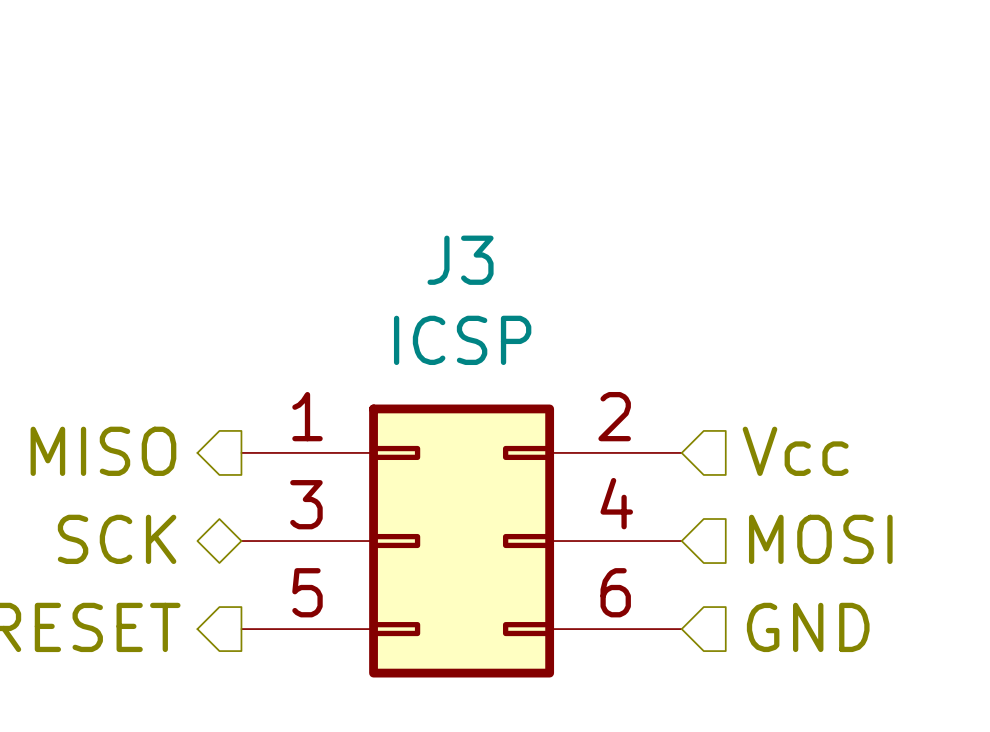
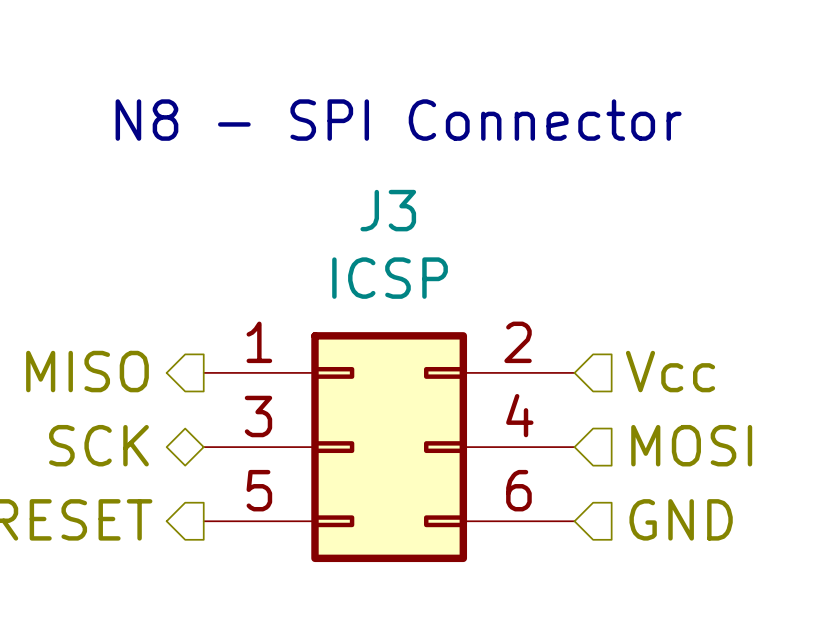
text: none -> N8 - SPI Connector (398, 120)

